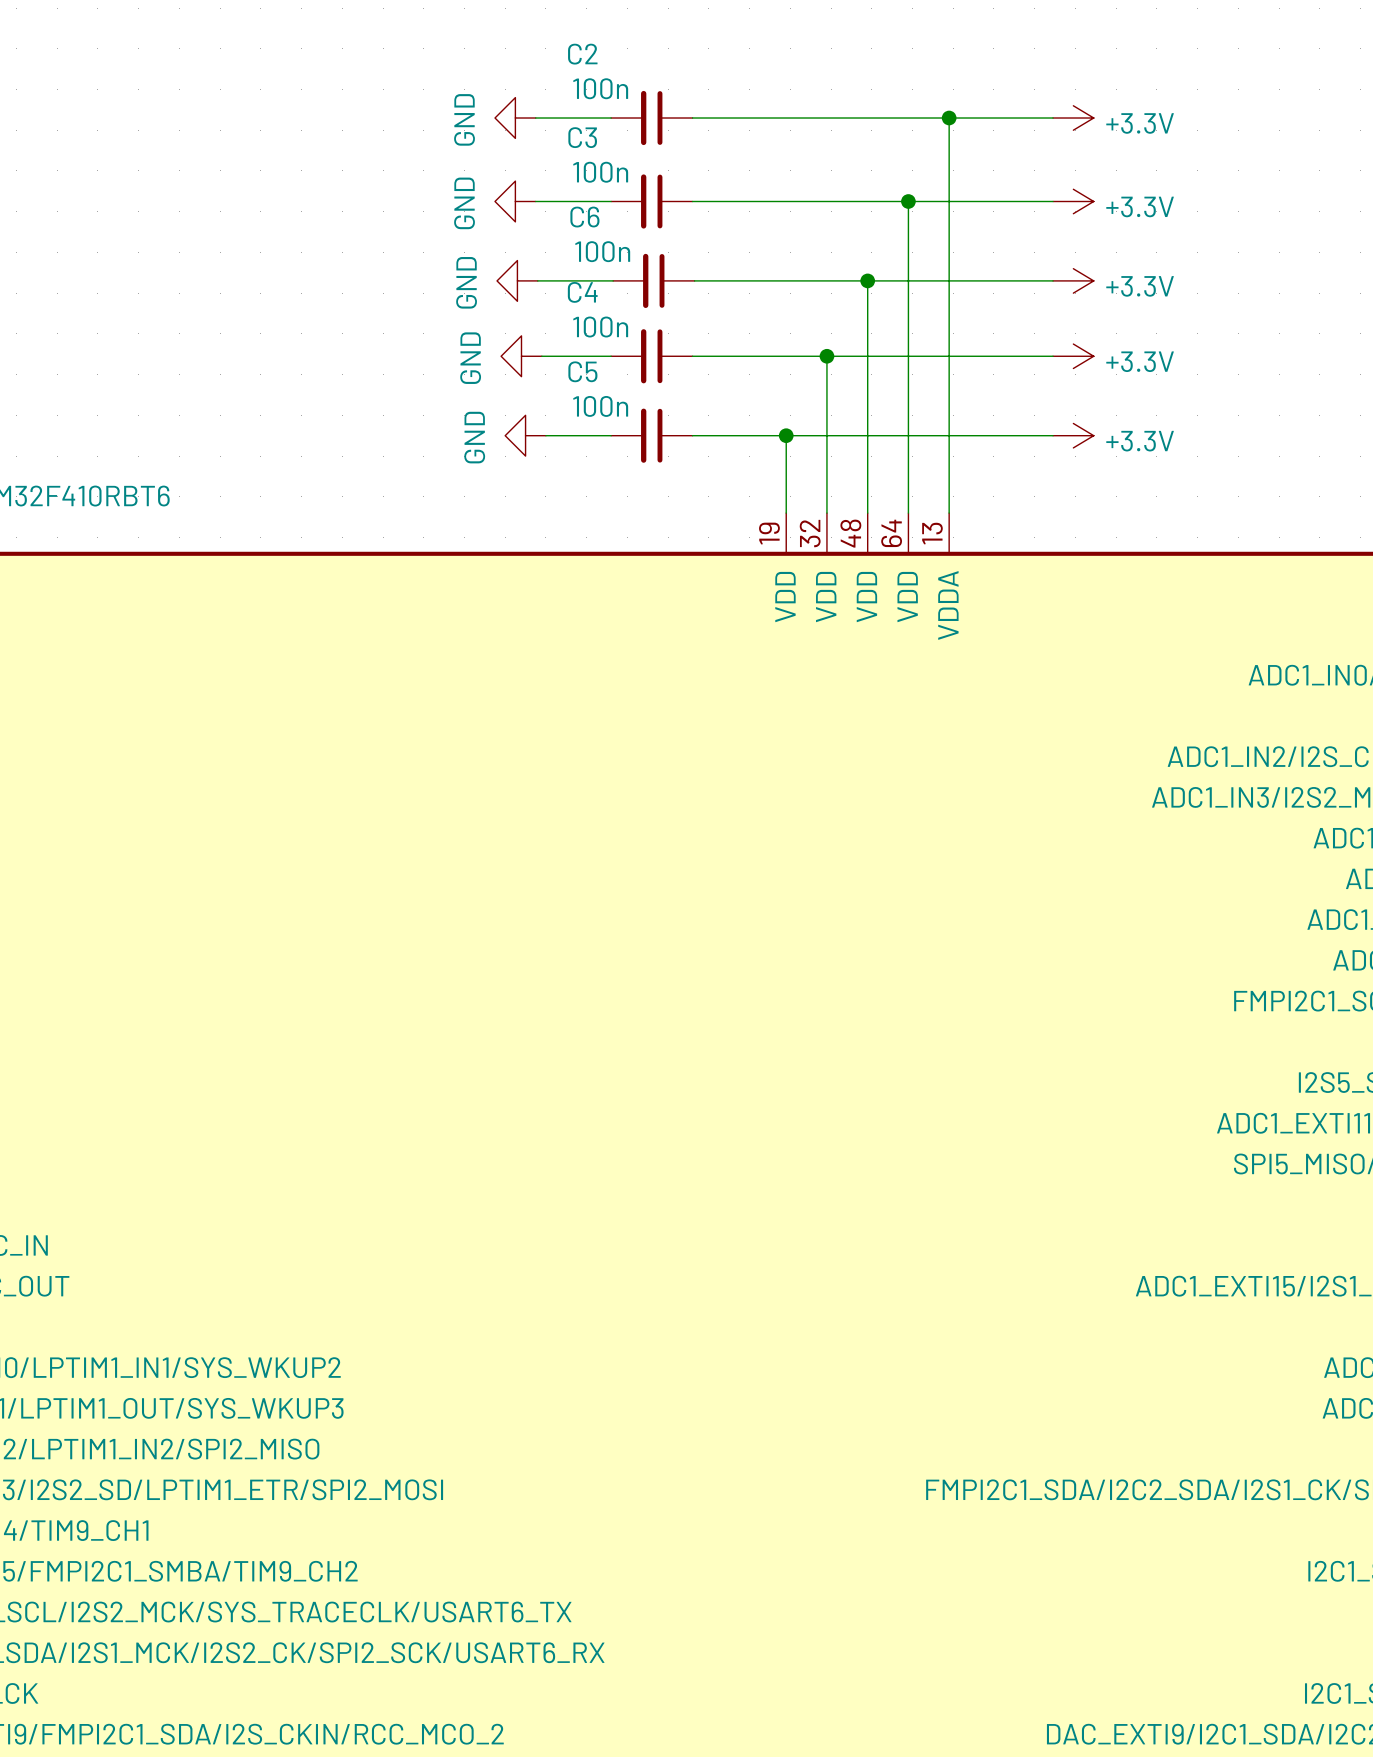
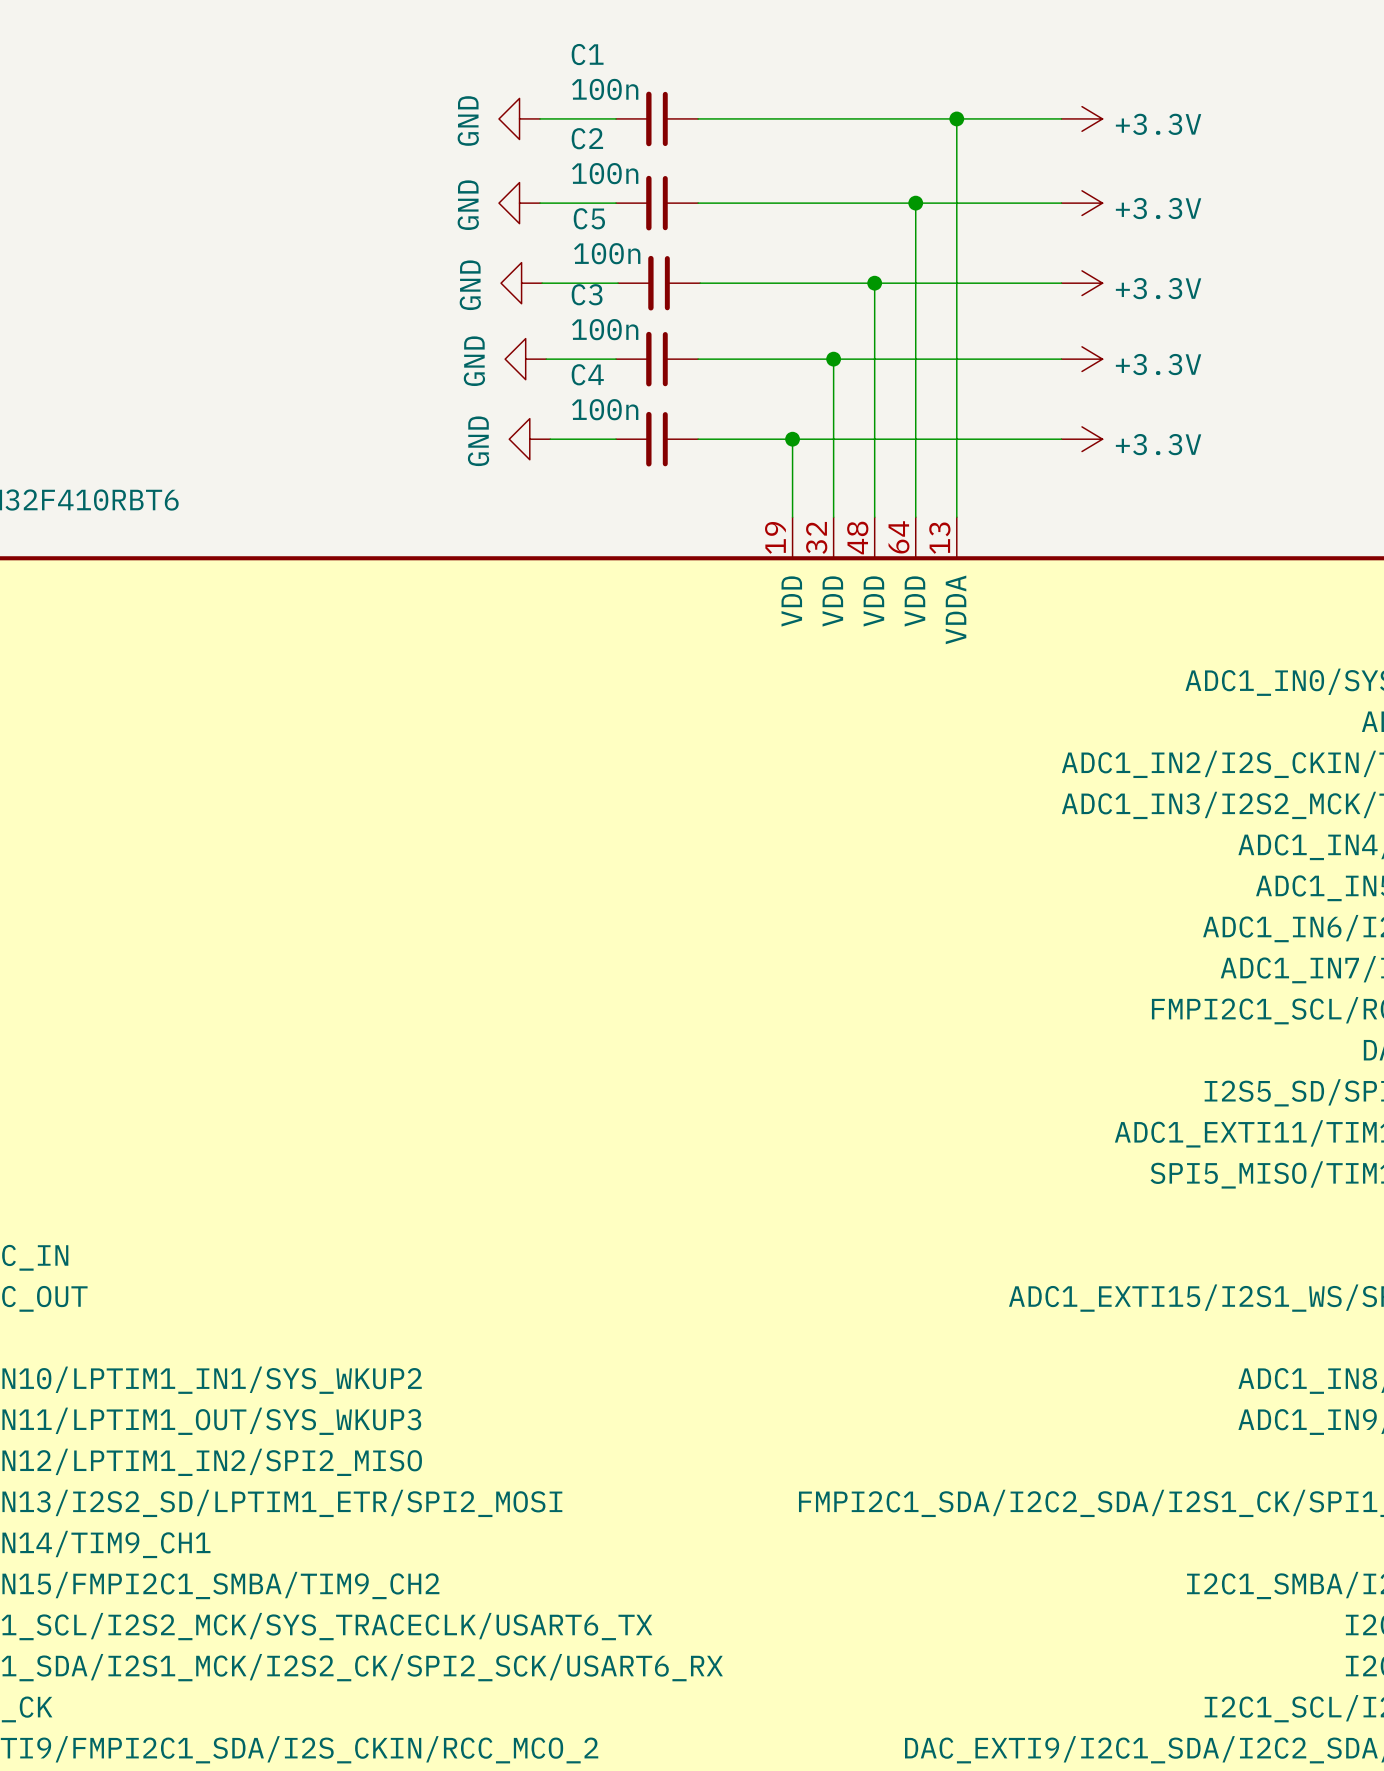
C2 name: C2 (582, 54) -> C1 (587, 54)
C3 name: C3 (582, 137) -> C2 (587, 138)
C6 name: C6 (584, 217) -> C5 (589, 218)
C4 name: C4 (582, 292) -> C3 (587, 294)
C5 name: C5 (582, 371) -> C4 (587, 374)

